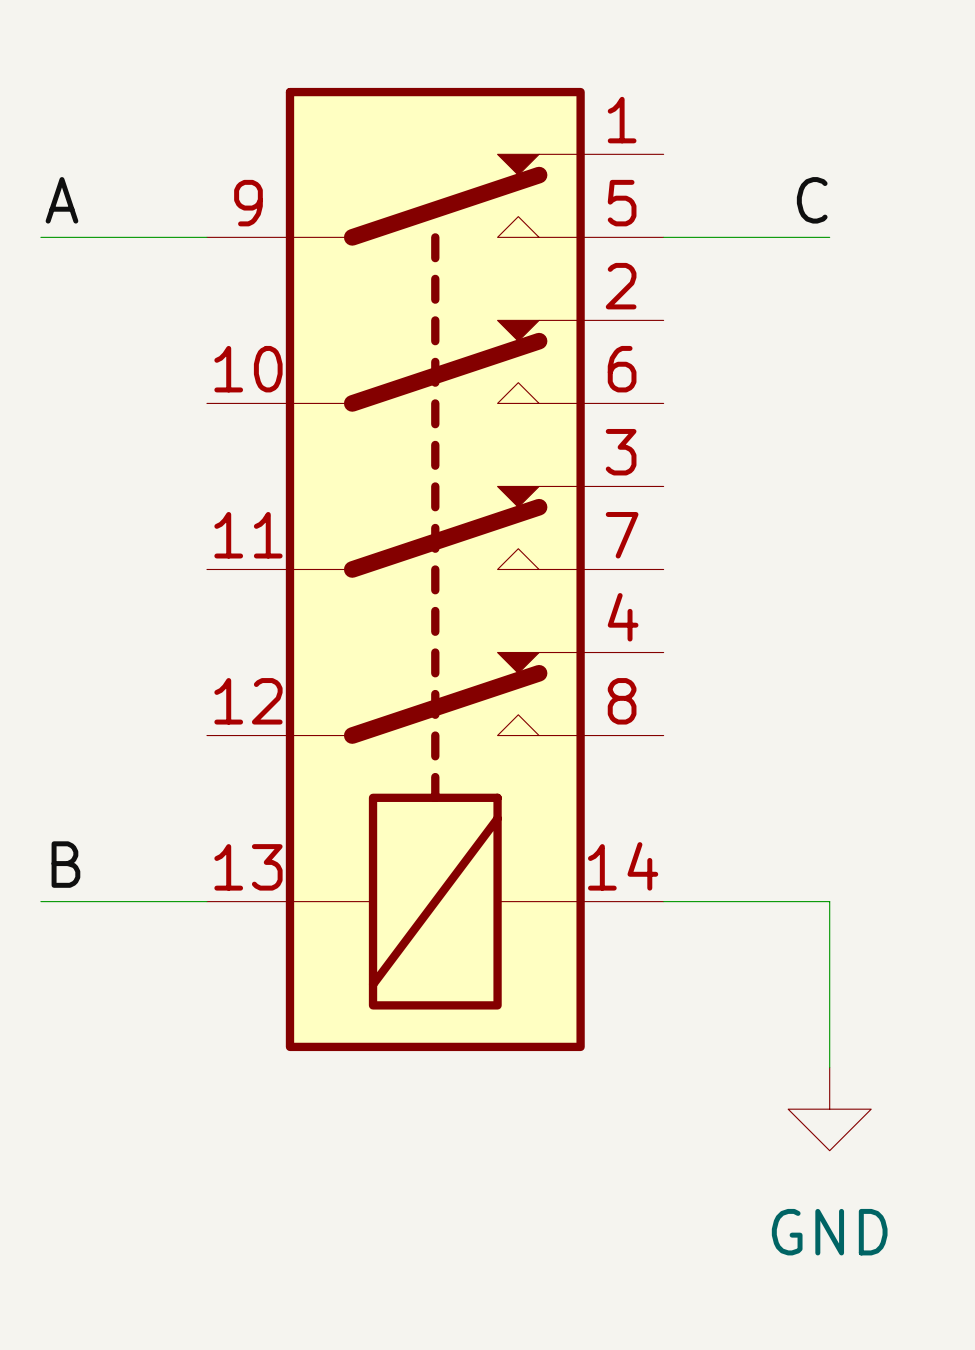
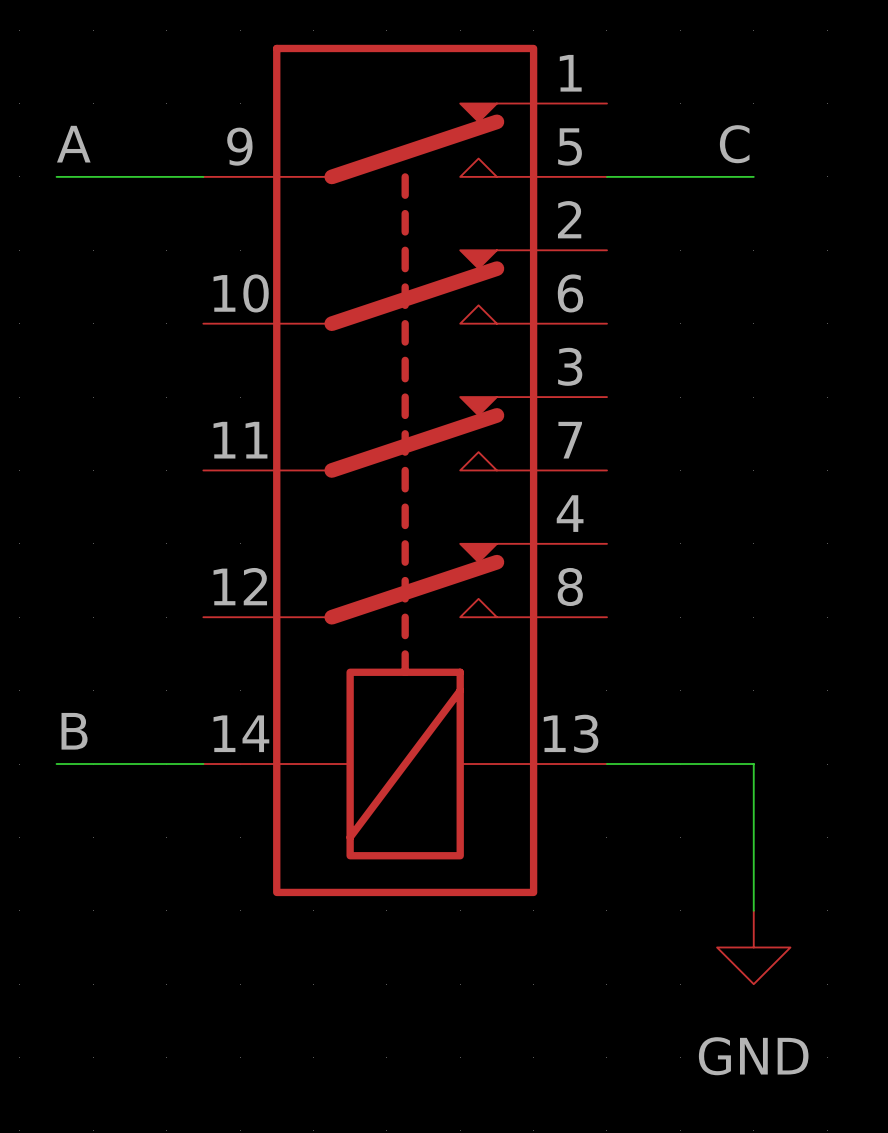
part pin number: 14 (623, 866) -> 13 (571, 733)
part pin number: 13 (248, 867) -> 14 (241, 733)

